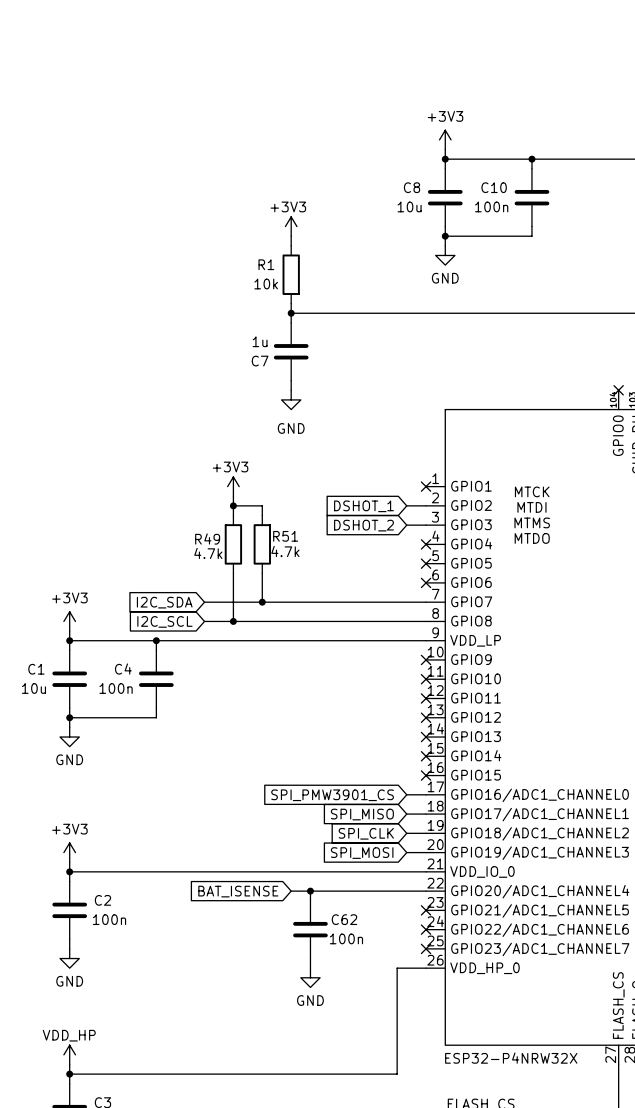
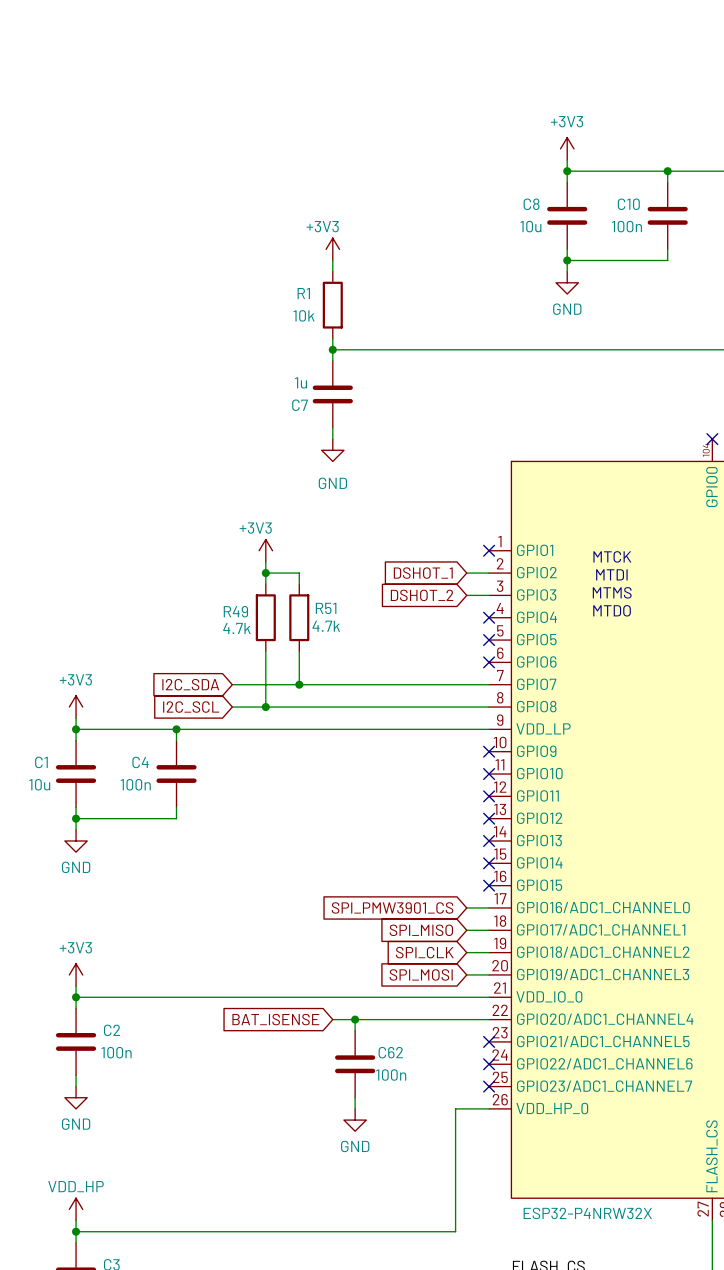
power symbol position: +3V3 (445, 139) -> +3V3 (567, 148)
wire: (445, 149) (445, 168) -> (567, 160) (567, 182)
wire: (445, 159) (493, 159) -> none
junction: (445, 159) -> none
junction: none -> (567, 171)
wire: (531, 159) (531, 168) -> (667, 171) (667, 182)
junction: (531, 159) -> none
junction: none -> (667, 171)
C8 position: (445, 197) -> (567, 215)
C10 position: (531, 197) -> (667, 215)
wire: (445, 226) (445, 245) -> (567, 249) (567, 271)
wire: (531, 226) (531, 236) -> (667, 249) (667, 260) (611, 260)
wire: (445, 236) (493, 236) -> none
junction: (445, 236) -> none
junction: none -> (567, 260)
power symbol position: GND (445, 255) -> GND (567, 282)

